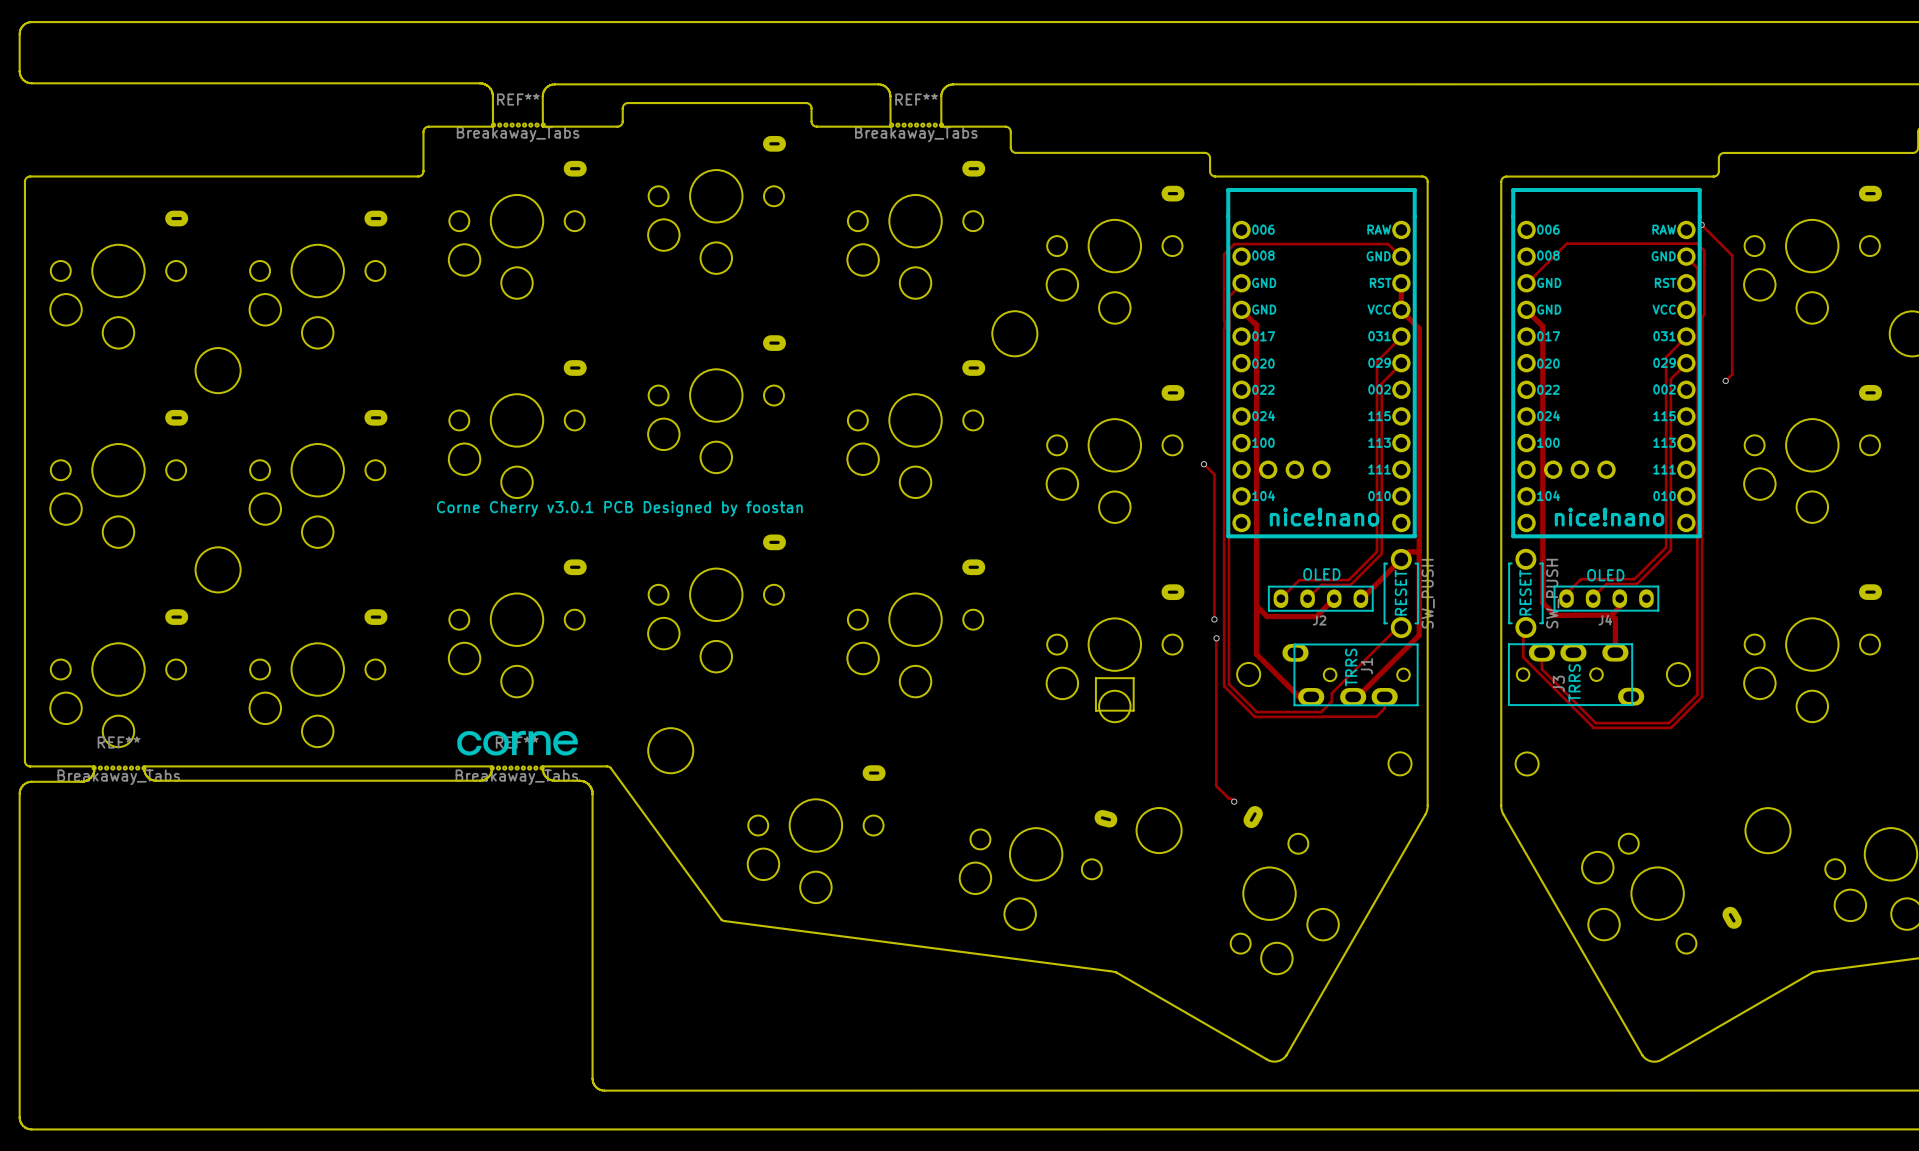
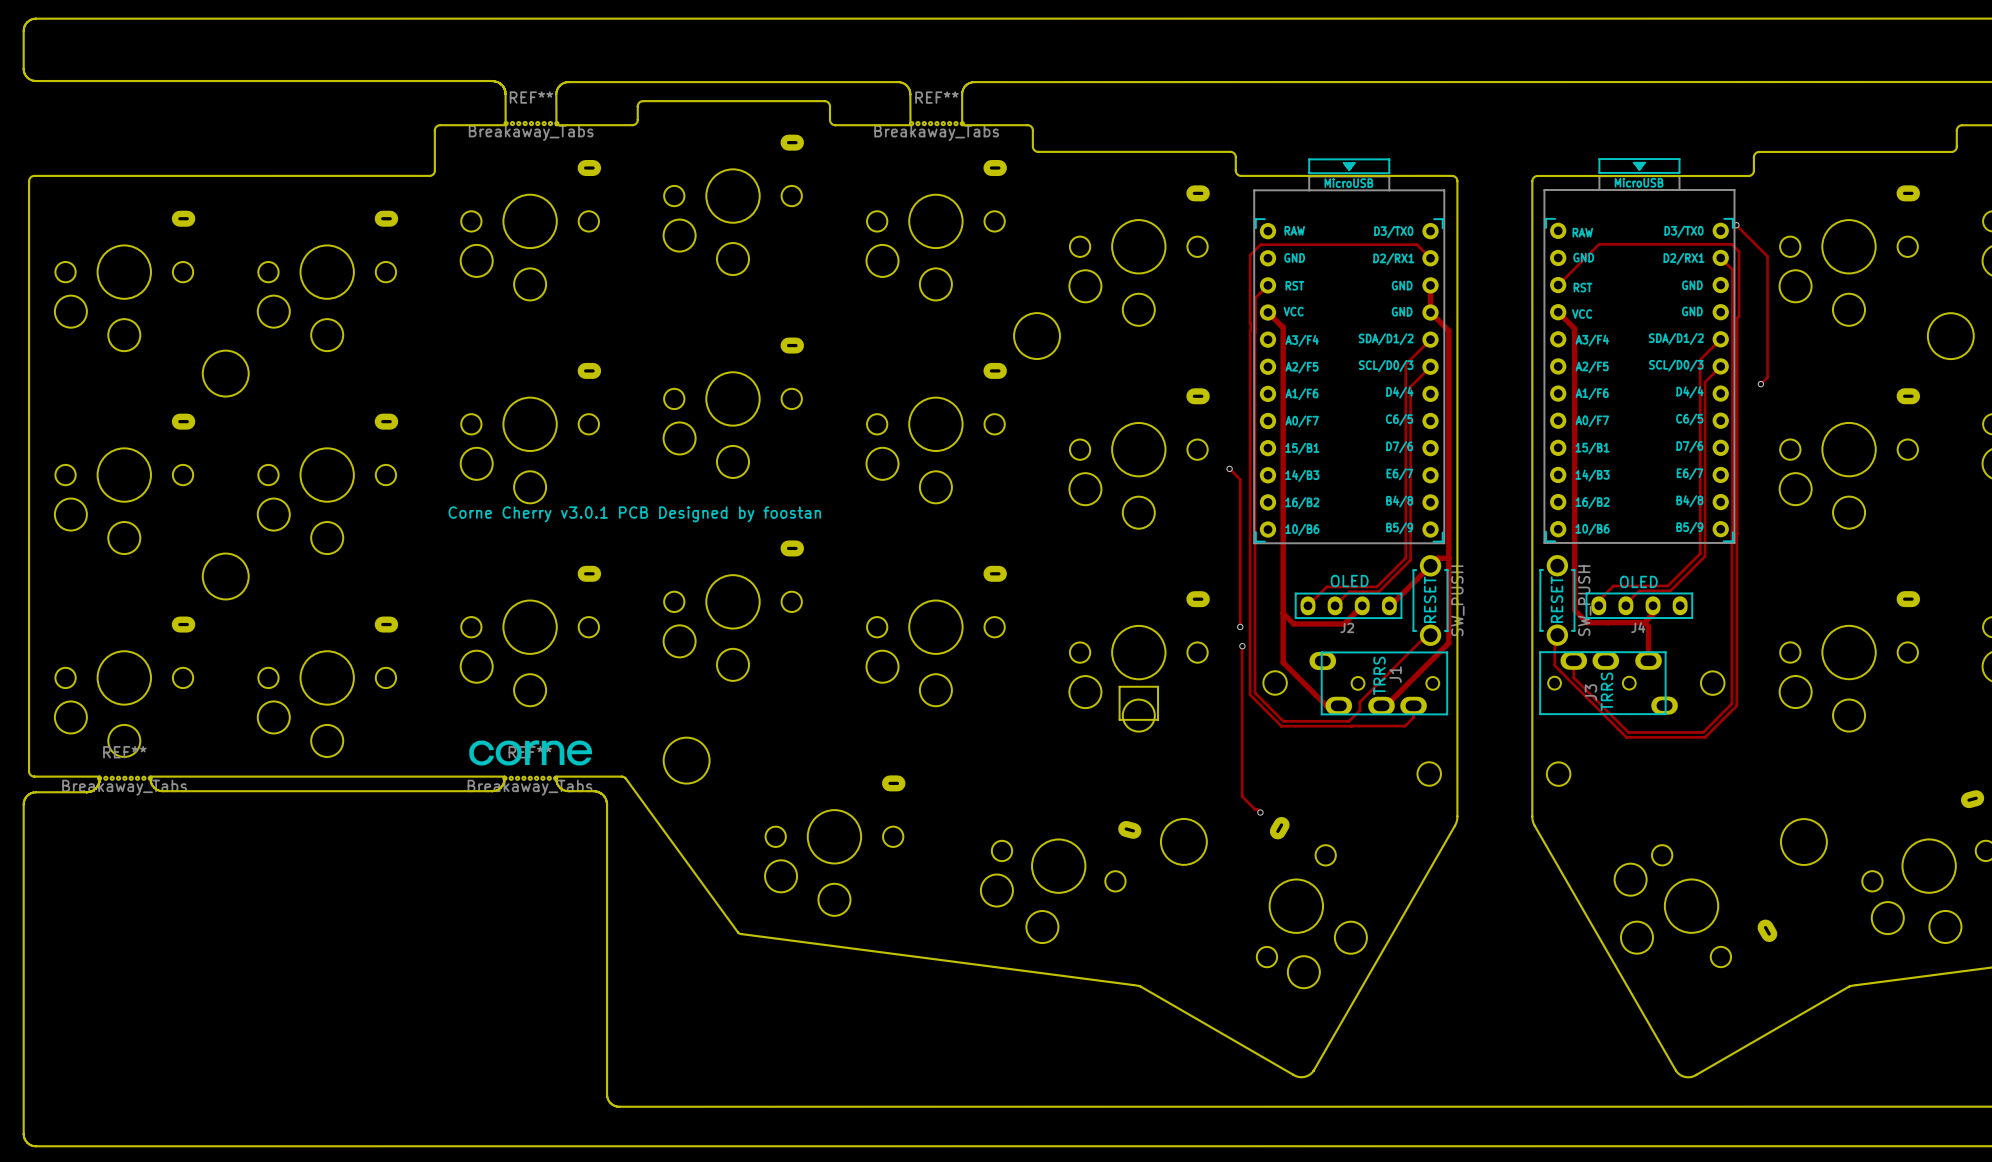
part: none -> (1349, 351)
part: none -> (1639, 350)
part: (1321, 363) -> none
part: (1606, 363) -> none

